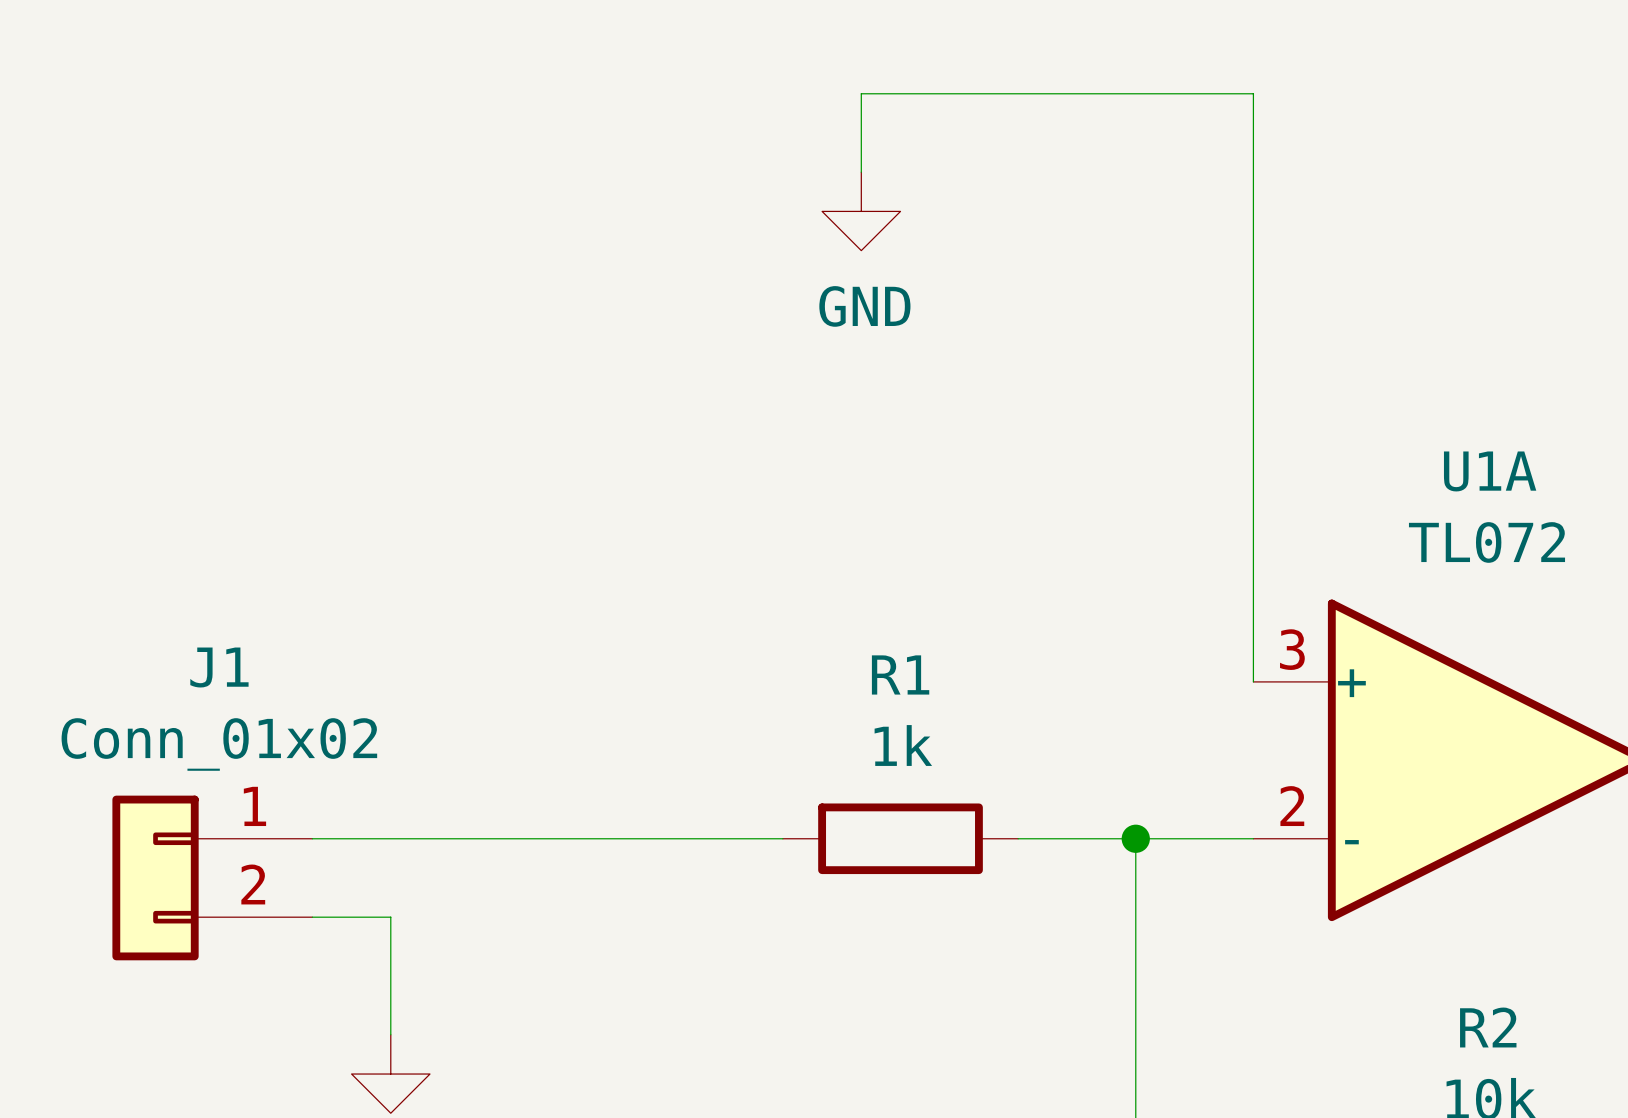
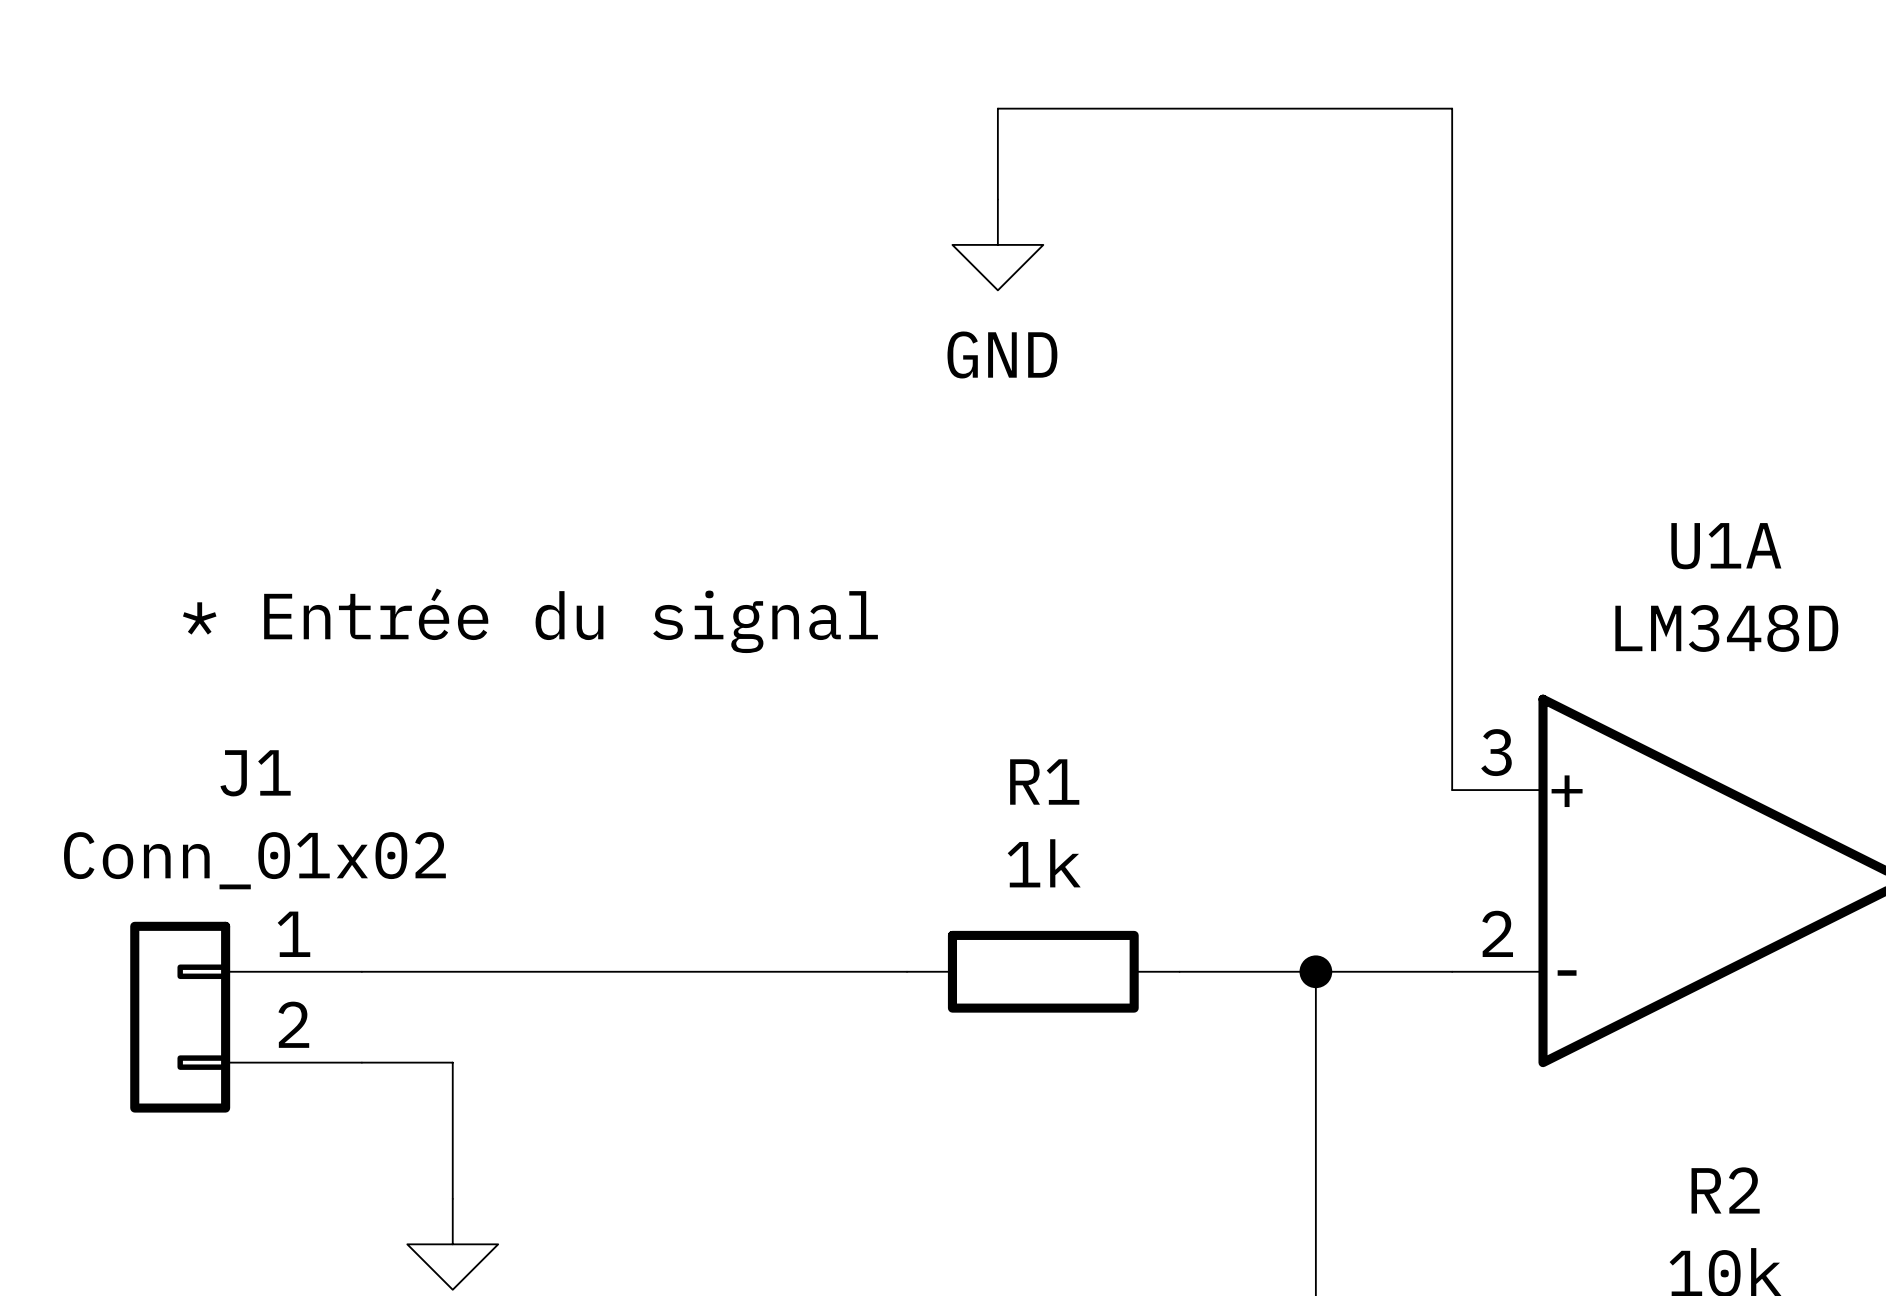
text: none -> * Entrée du signal (530, 620)
U1A value: TL072 (1487, 542) -> LM348D (1726, 628)

